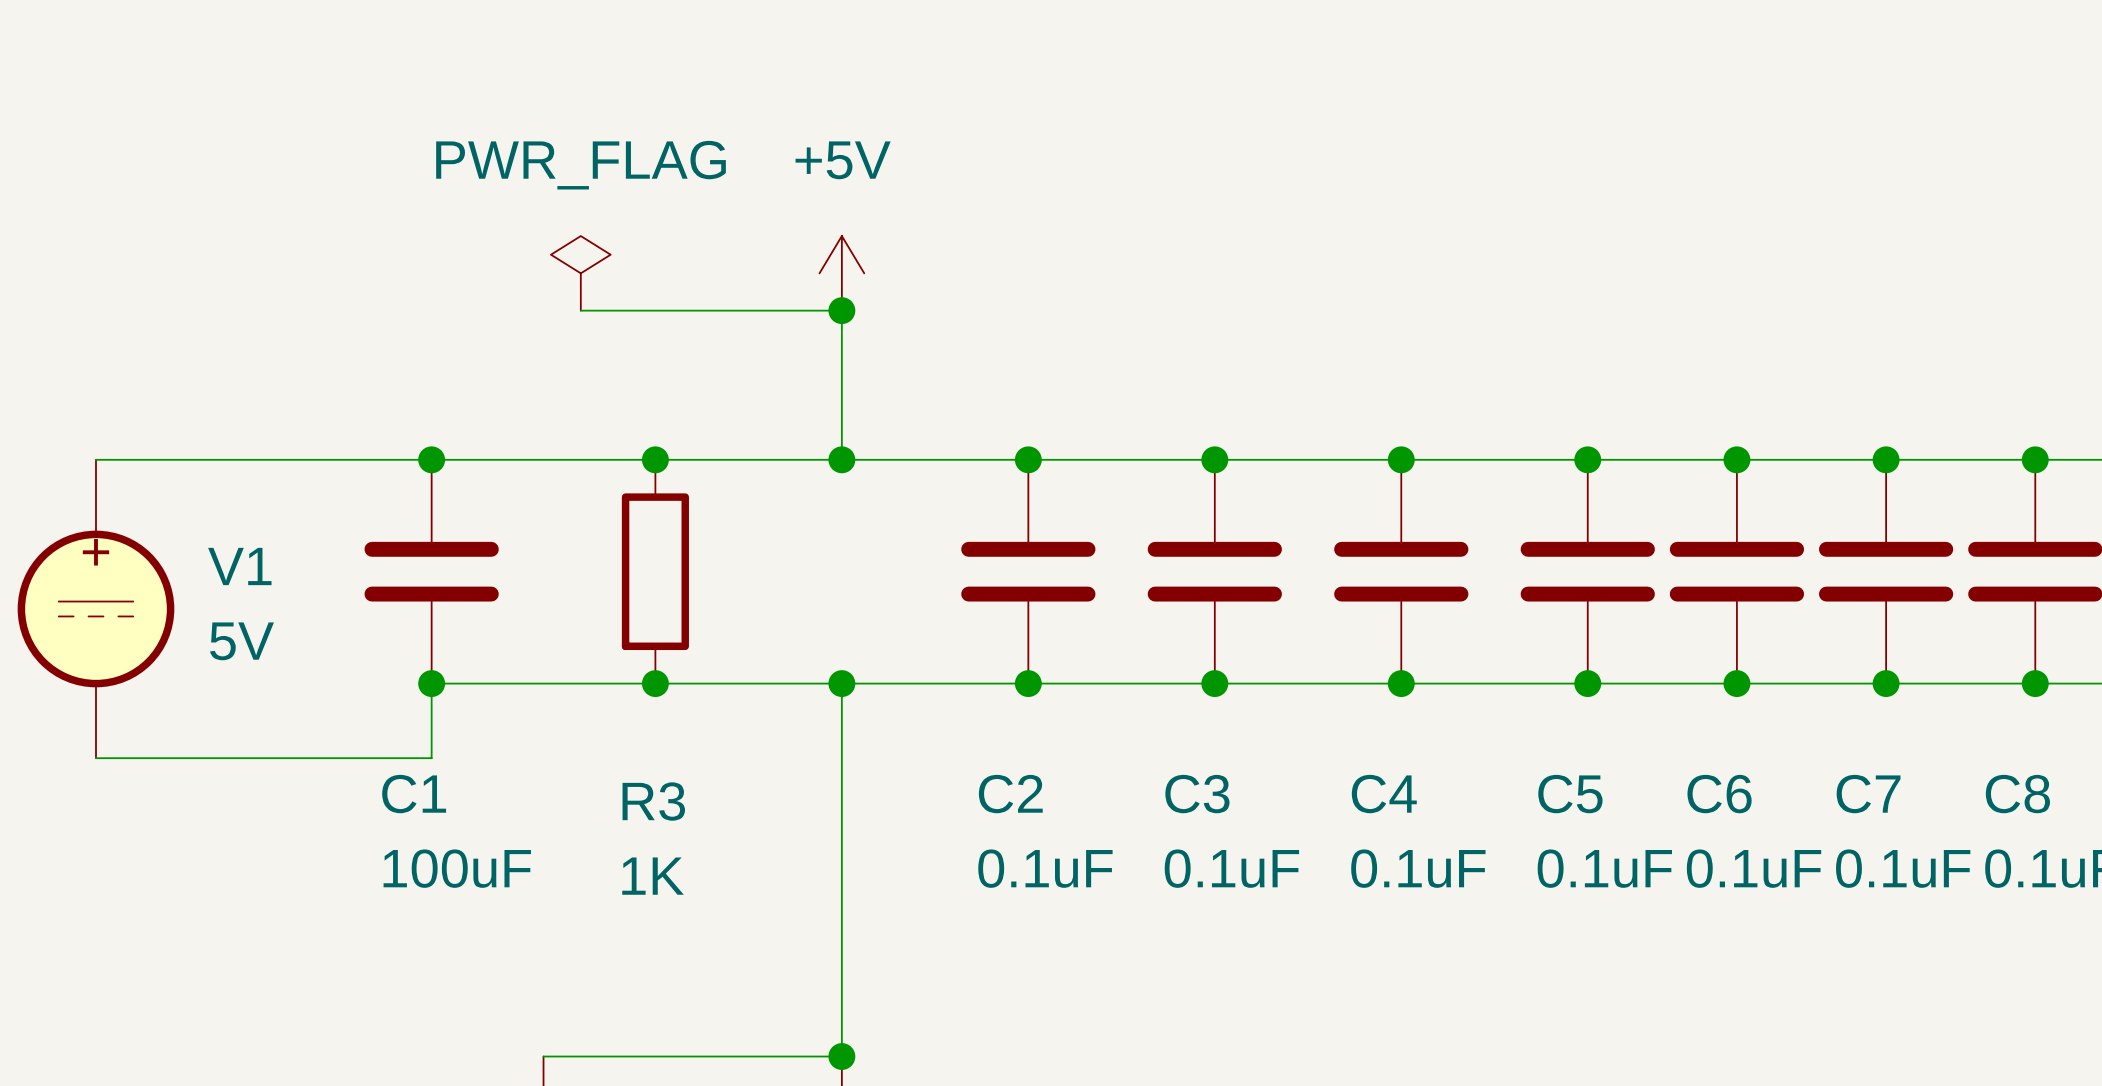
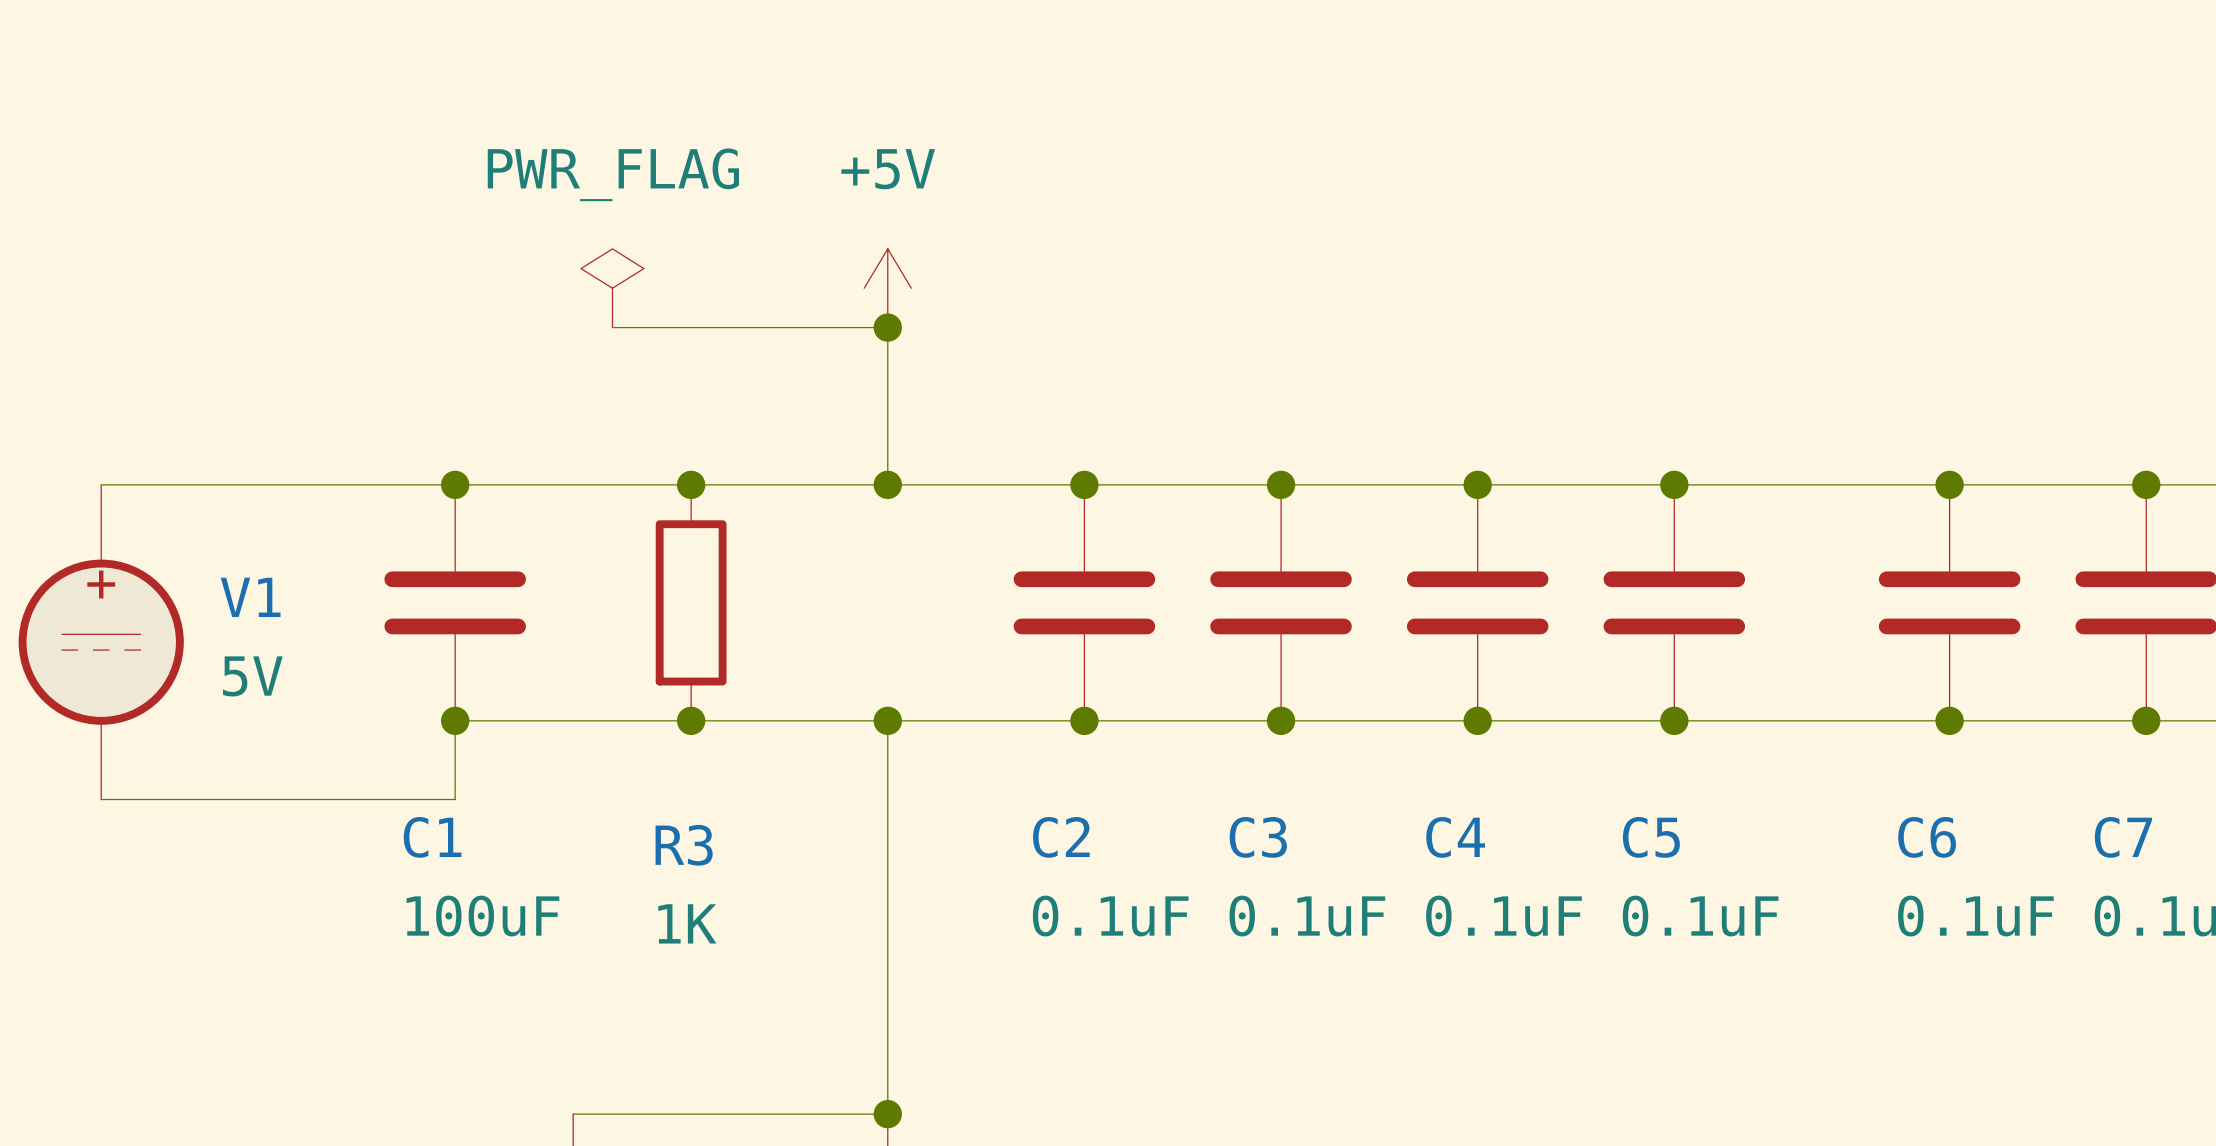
junction: (1736, 459) -> none
junction position: (1886, 459) -> (1949, 484)
C6 position: (1736, 571) -> (1949, 602)
C7: 0.1uF (1886, 571) -> none
junction: (1736, 683) -> none
junction position: (1886, 683) -> (1949, 720)
C8 name: C8 (2017, 794) -> C7 (2123, 837)

